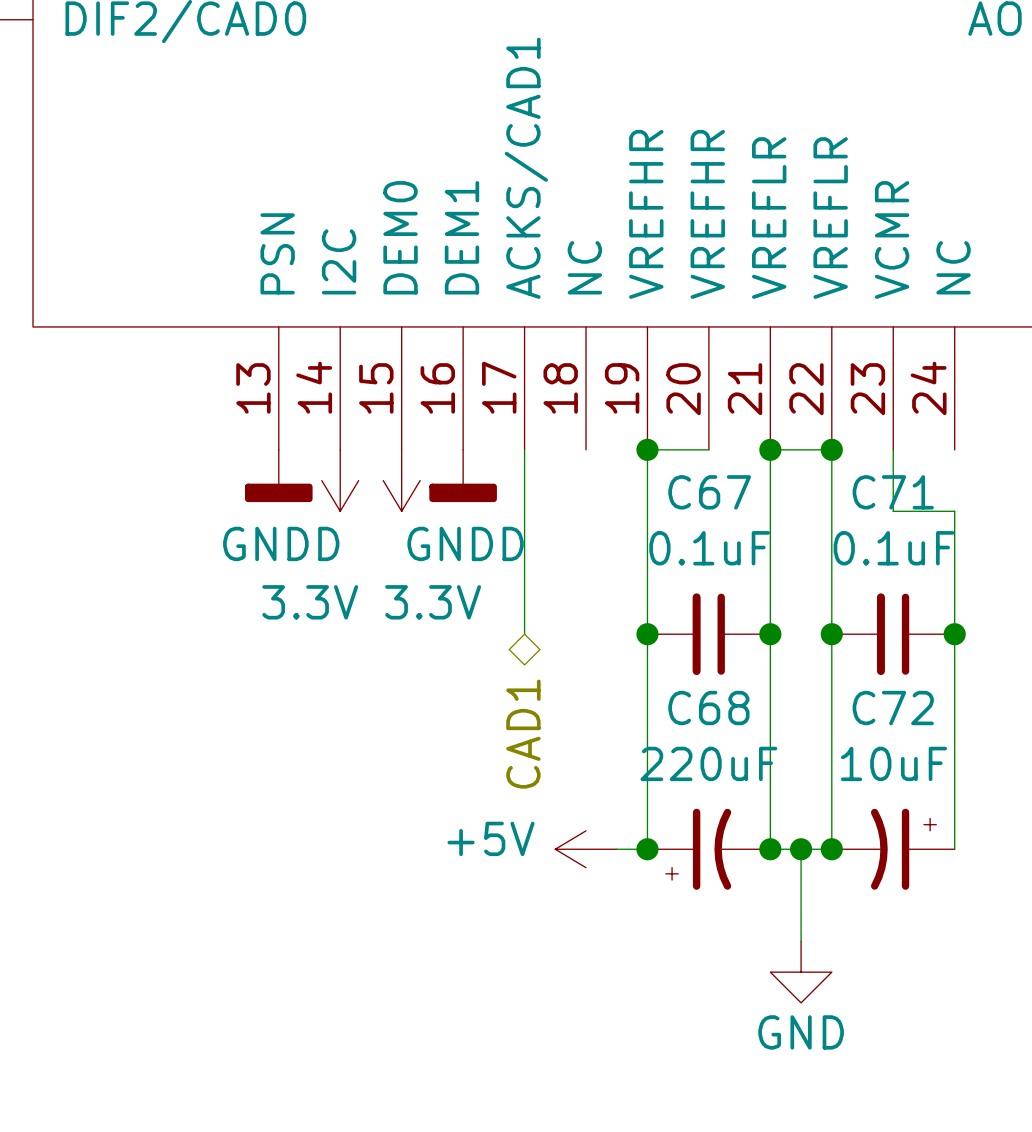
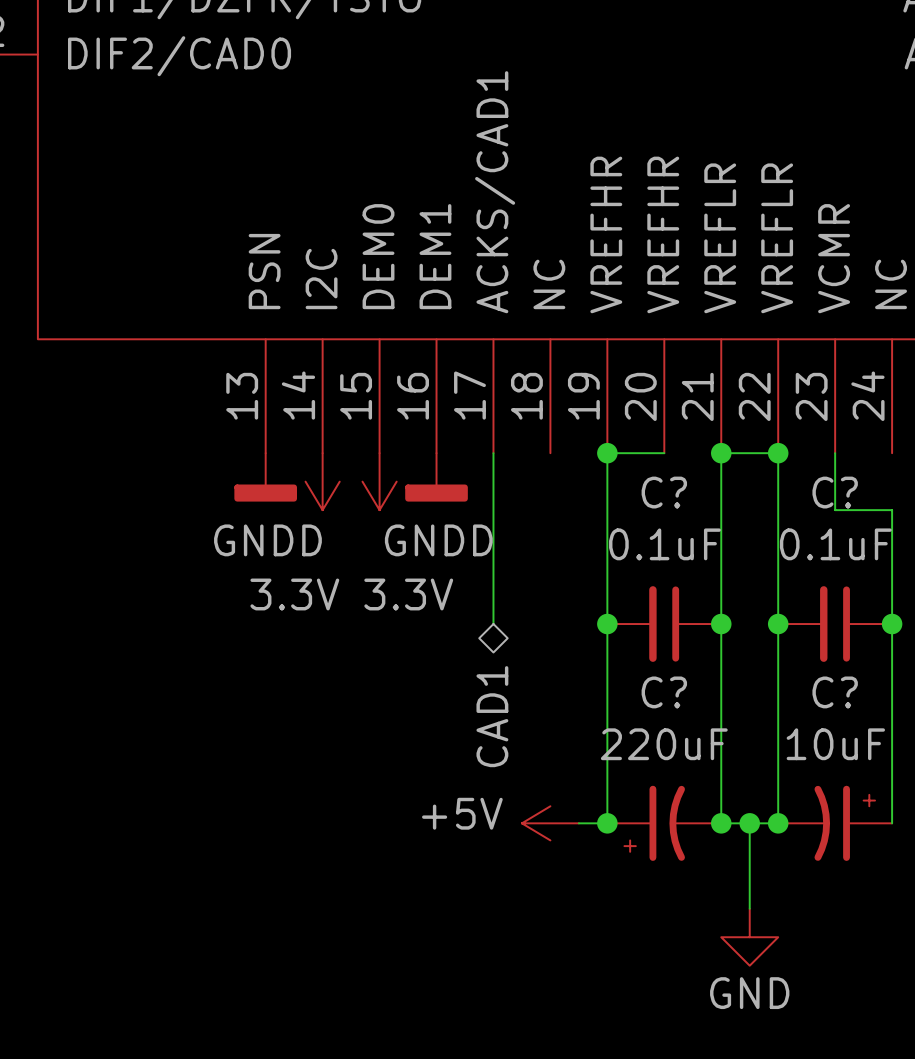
C67 name: C67 (709, 492) -> C? (664, 492)
C71 name: C71 (893, 492) -> C? (835, 492)
C68 name: C68 (708, 708) -> C? (664, 692)
C72 name: C72 (893, 708) -> C? (835, 692)

